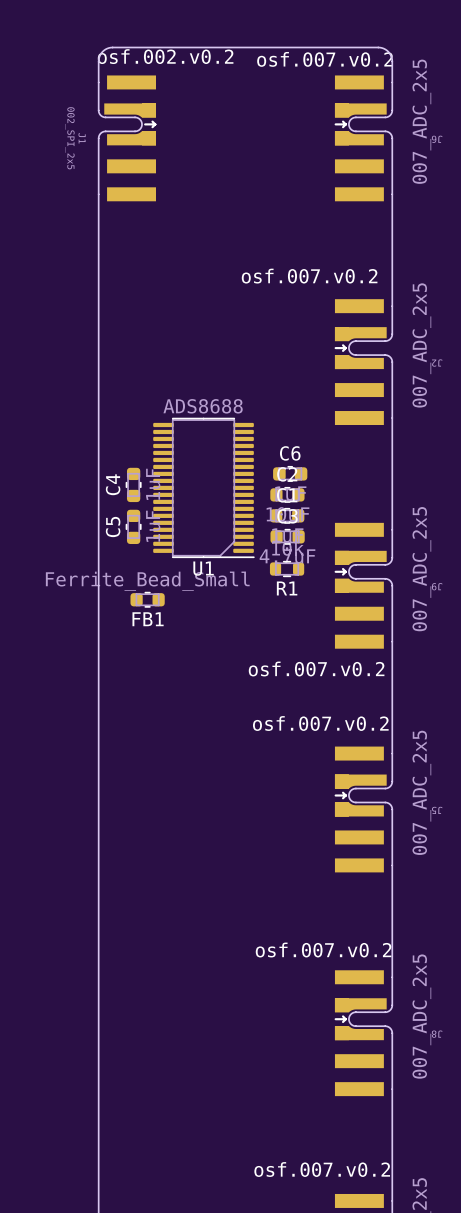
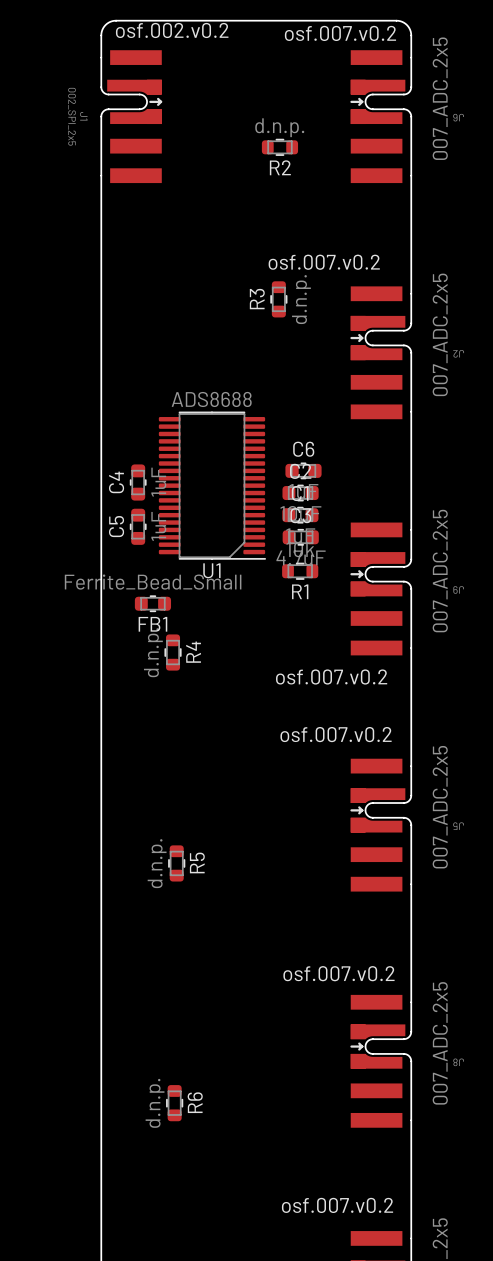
R2: none -> d.n.p. (279, 147)
R3: none -> d.n.p. (278, 299)
R4: none -> d.n.p. (173, 652)
R5: none -> d.n.p. (176, 863)
R6: none -> d.n.p. (174, 1103)

